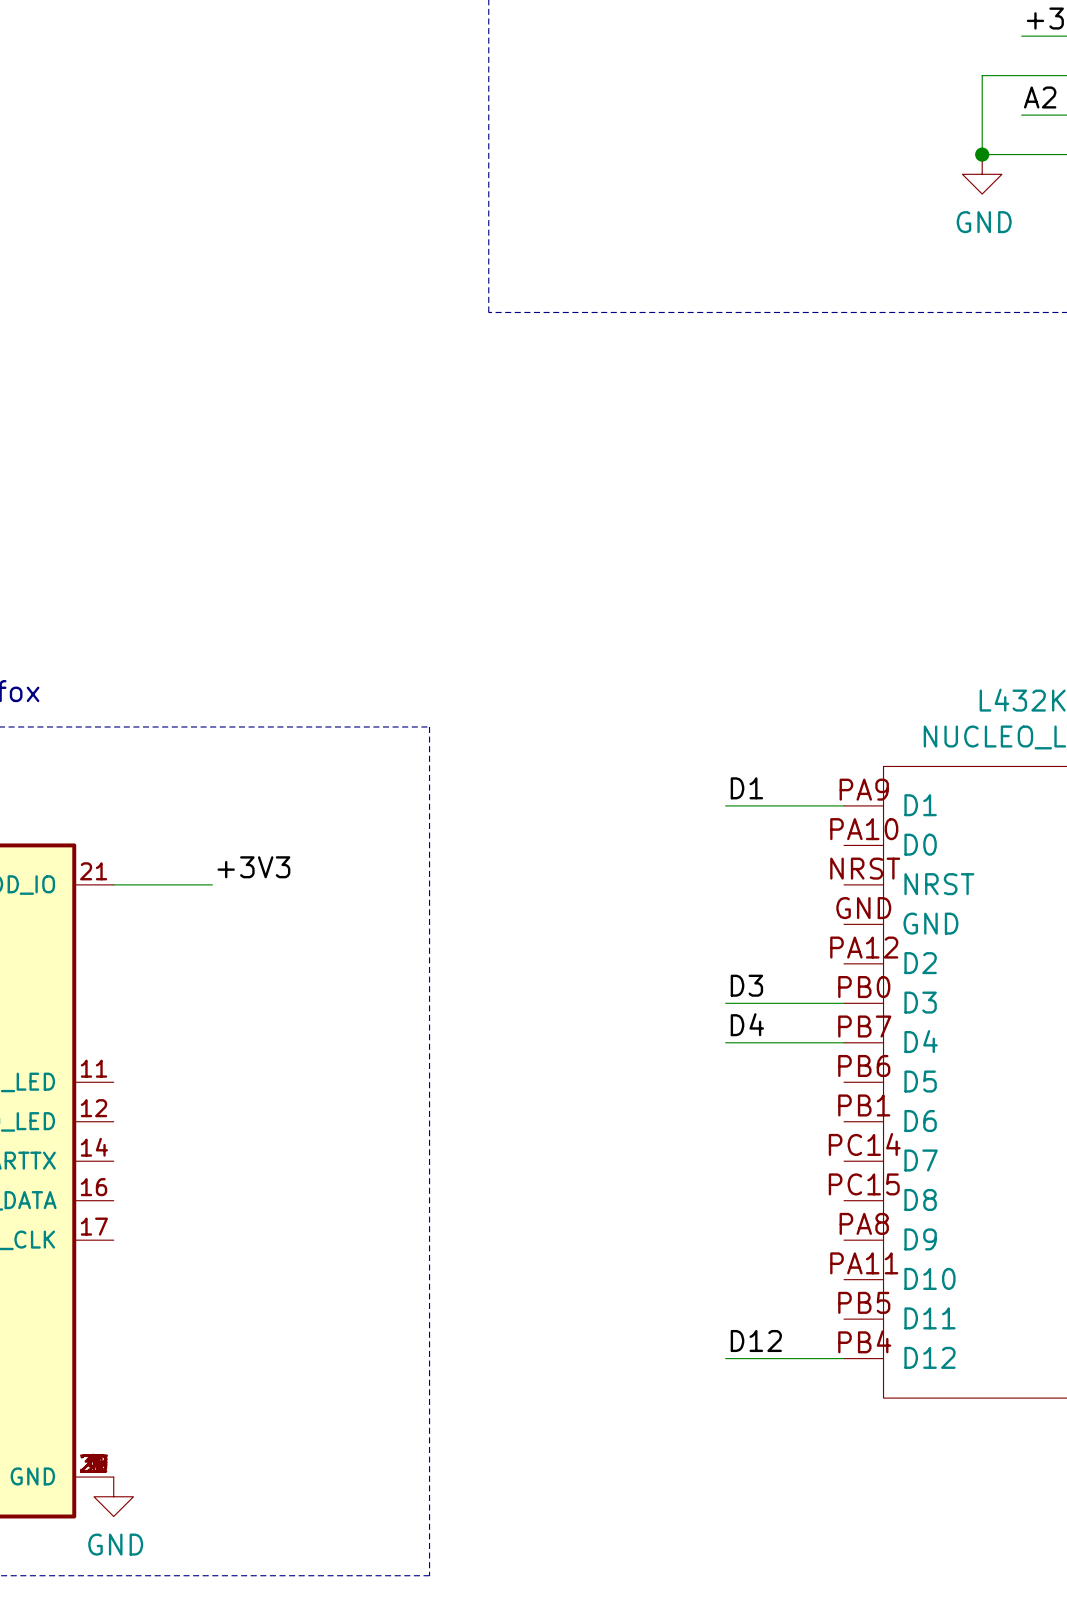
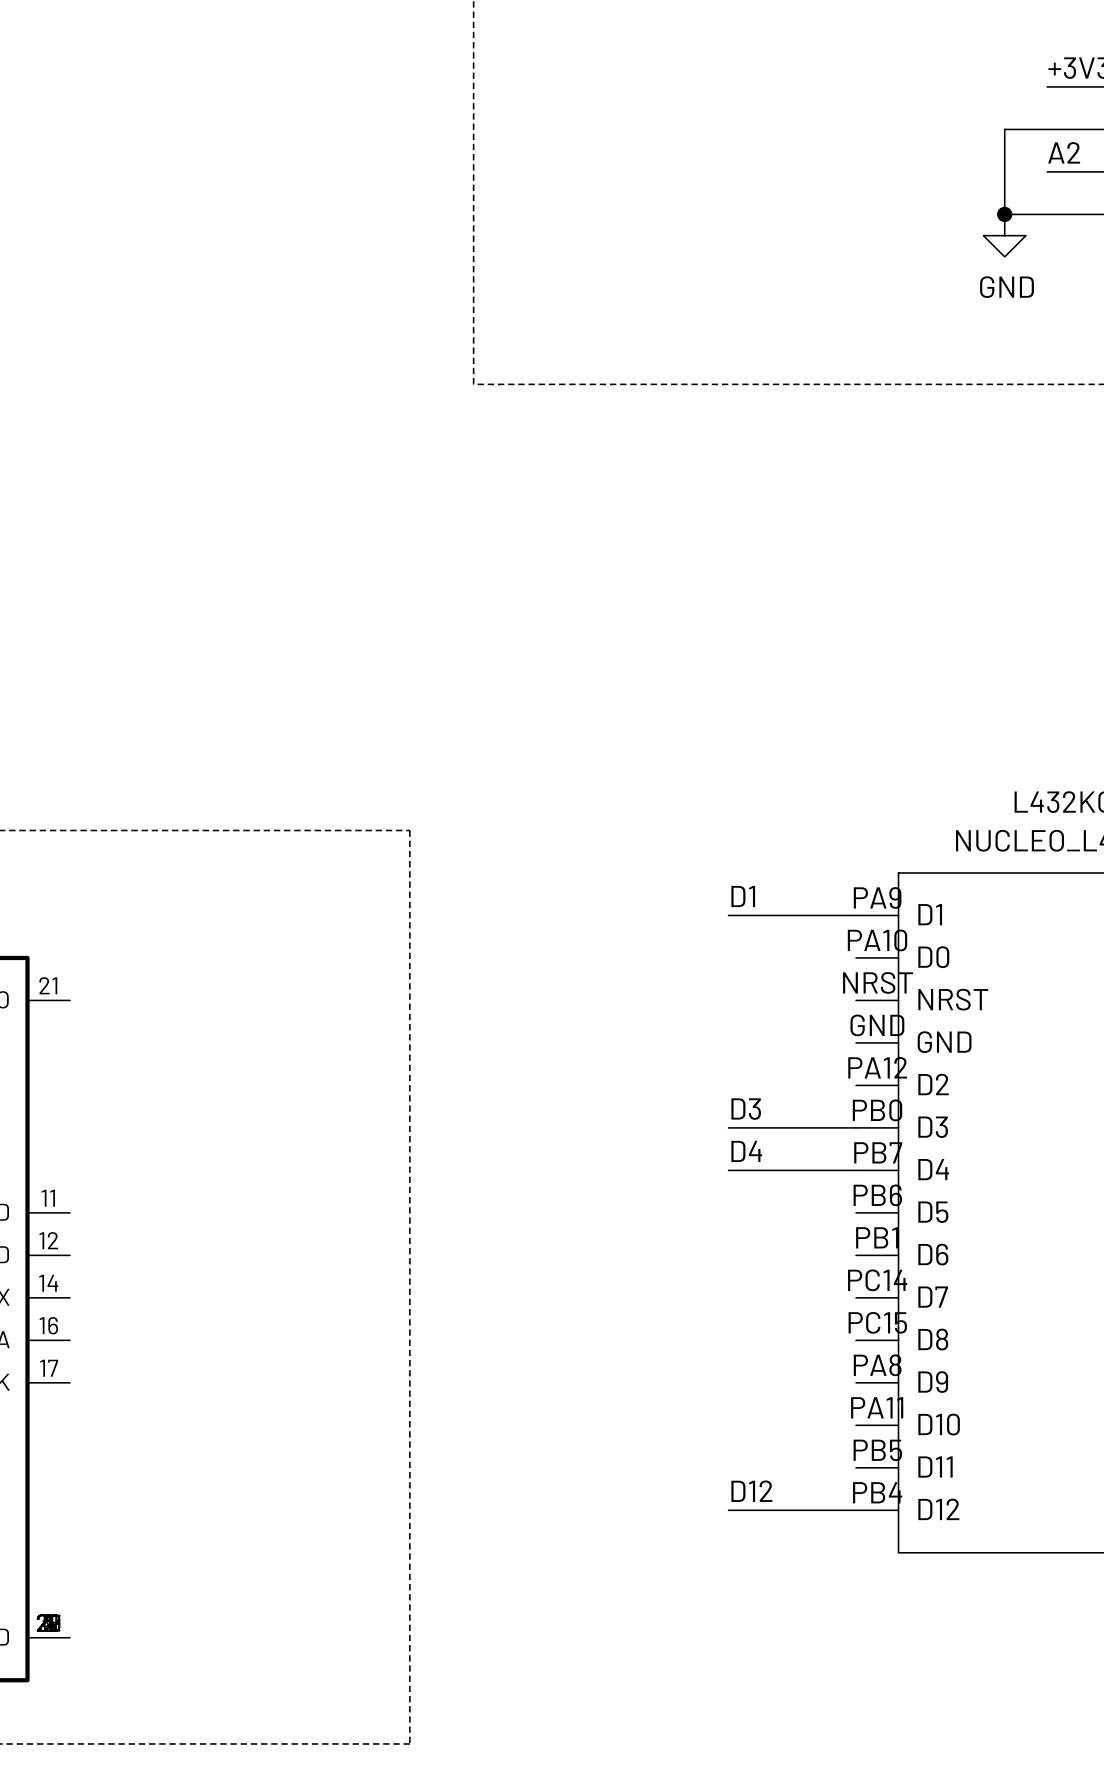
label: +3V3 (253, 867) -> none
wire: (113, 884) (212, 884) -> none
power symbol: GND (113, 1496) -> none

